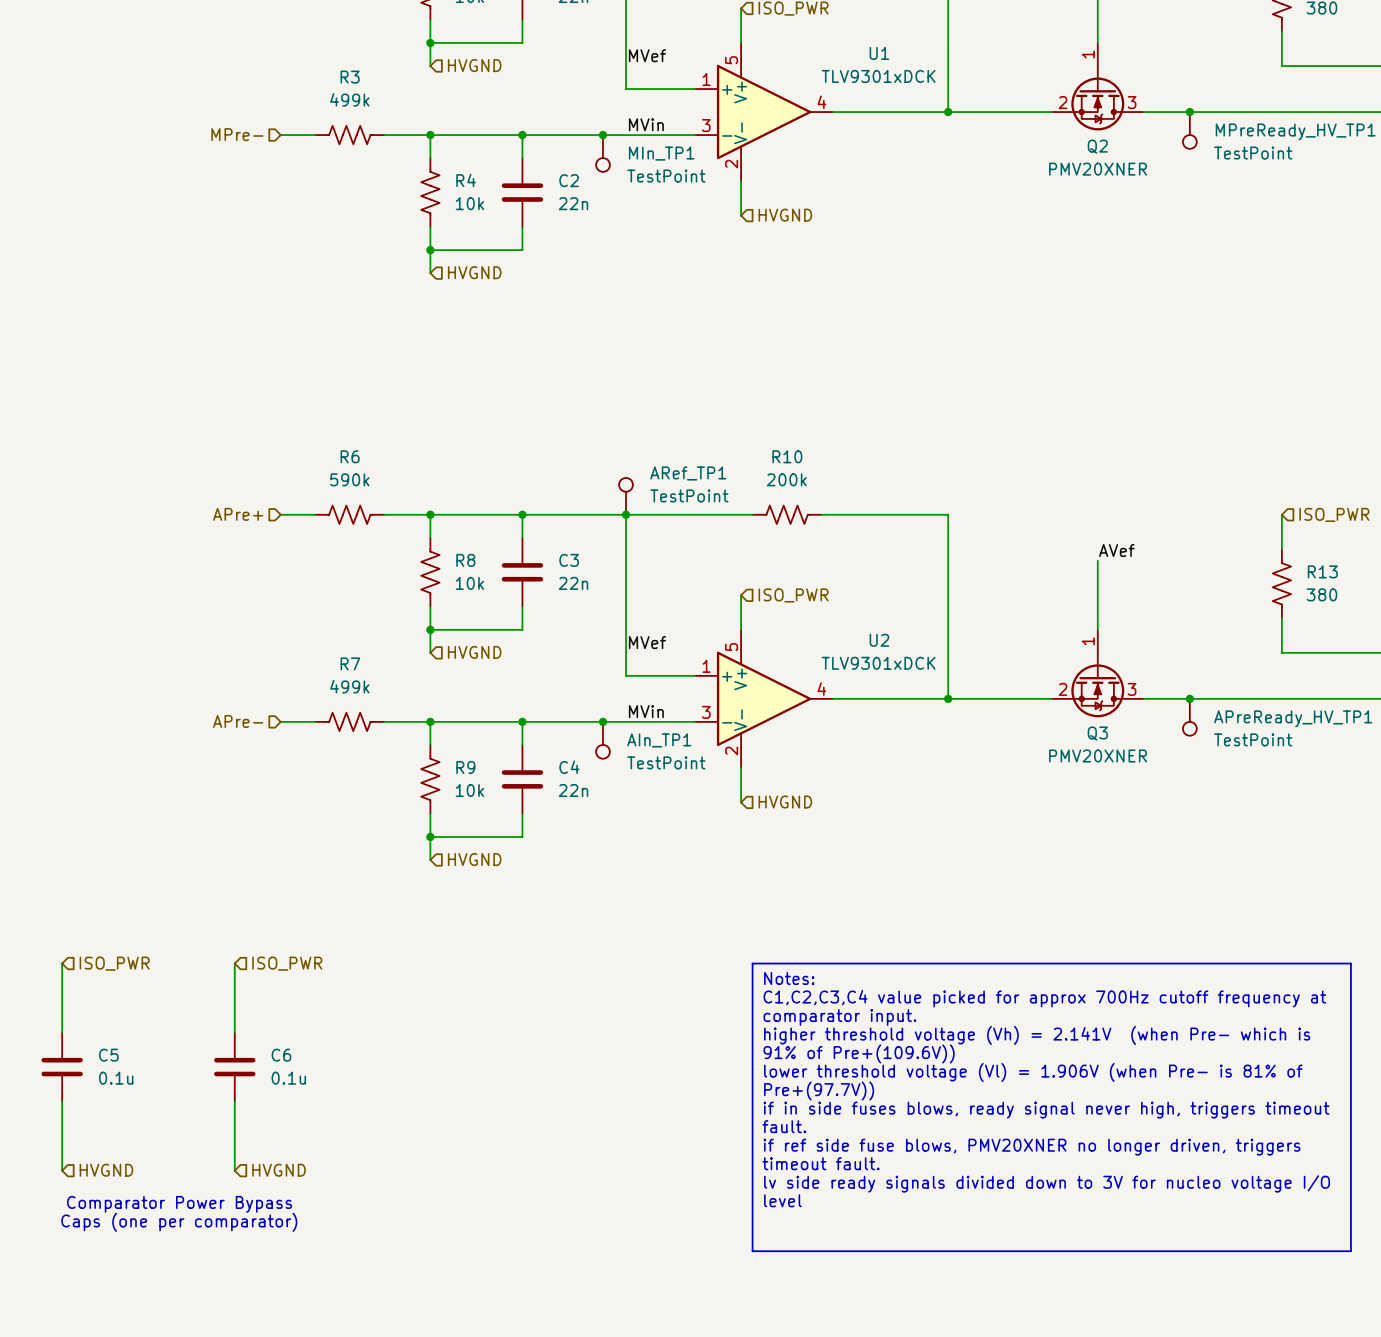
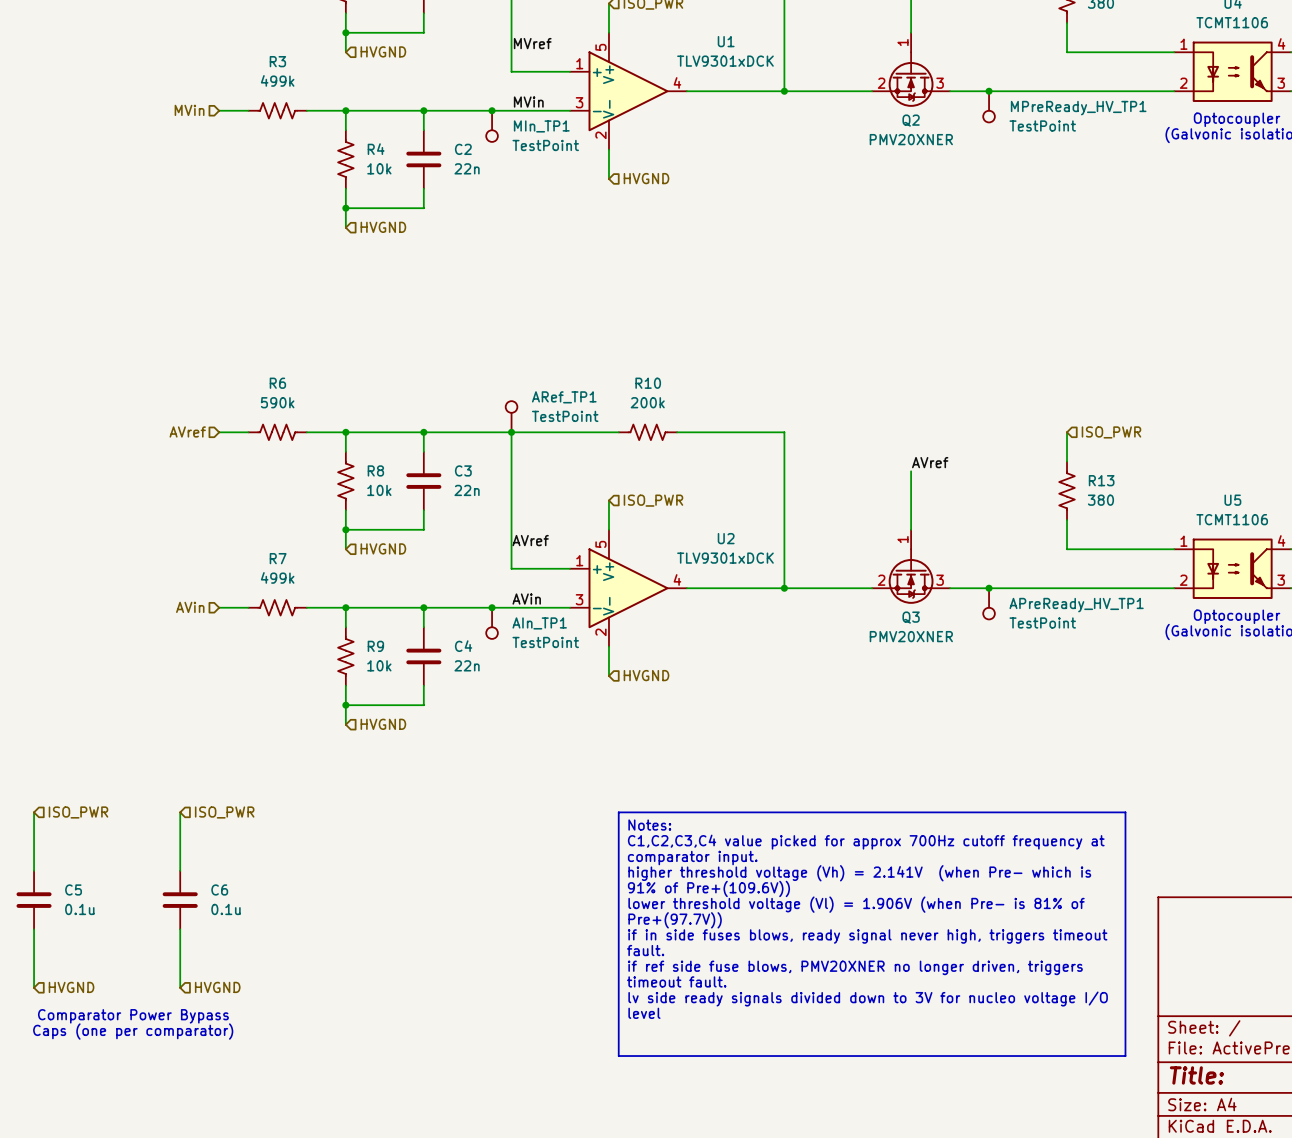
label: MVef (647, 55) -> MVref (532, 43)
hierarchical label: MPre- (237, 134) -> MVin (189, 110)
hierarchical label: APre+ (238, 514) -> AVref (187, 431)
label: AVef (1116, 550) -> AVref (930, 462)
label: MVef (647, 642) -> AVref (530, 540)
label: MVin (646, 711) -> AVin (526, 599)
hierarchical label: APre- (238, 721) -> AVin (190, 607)

